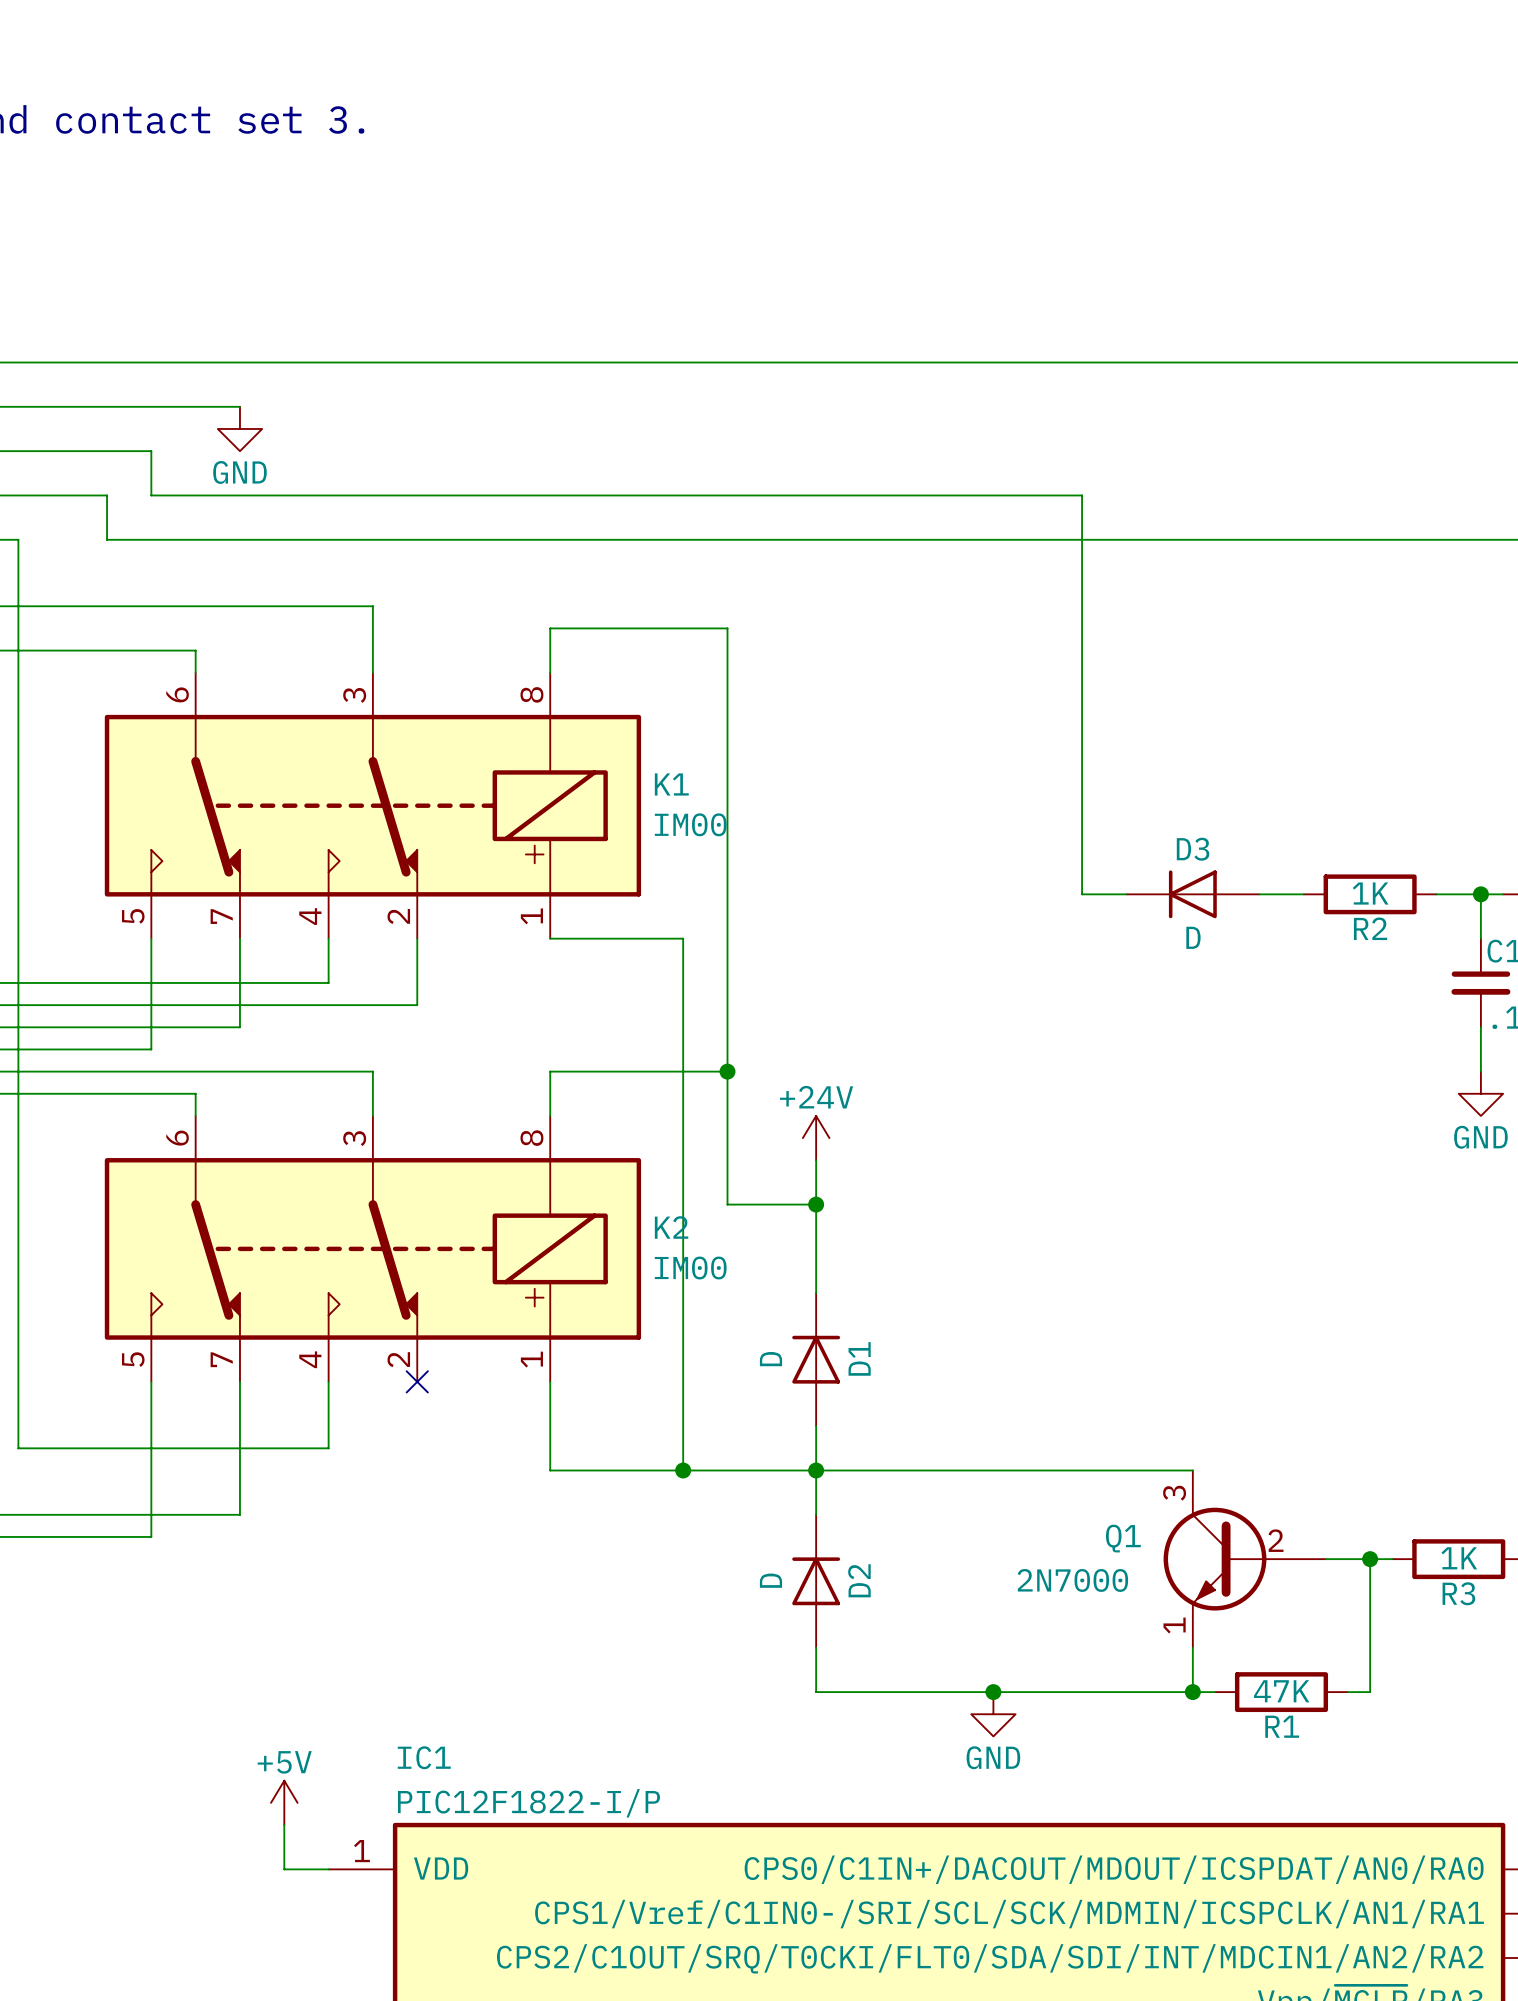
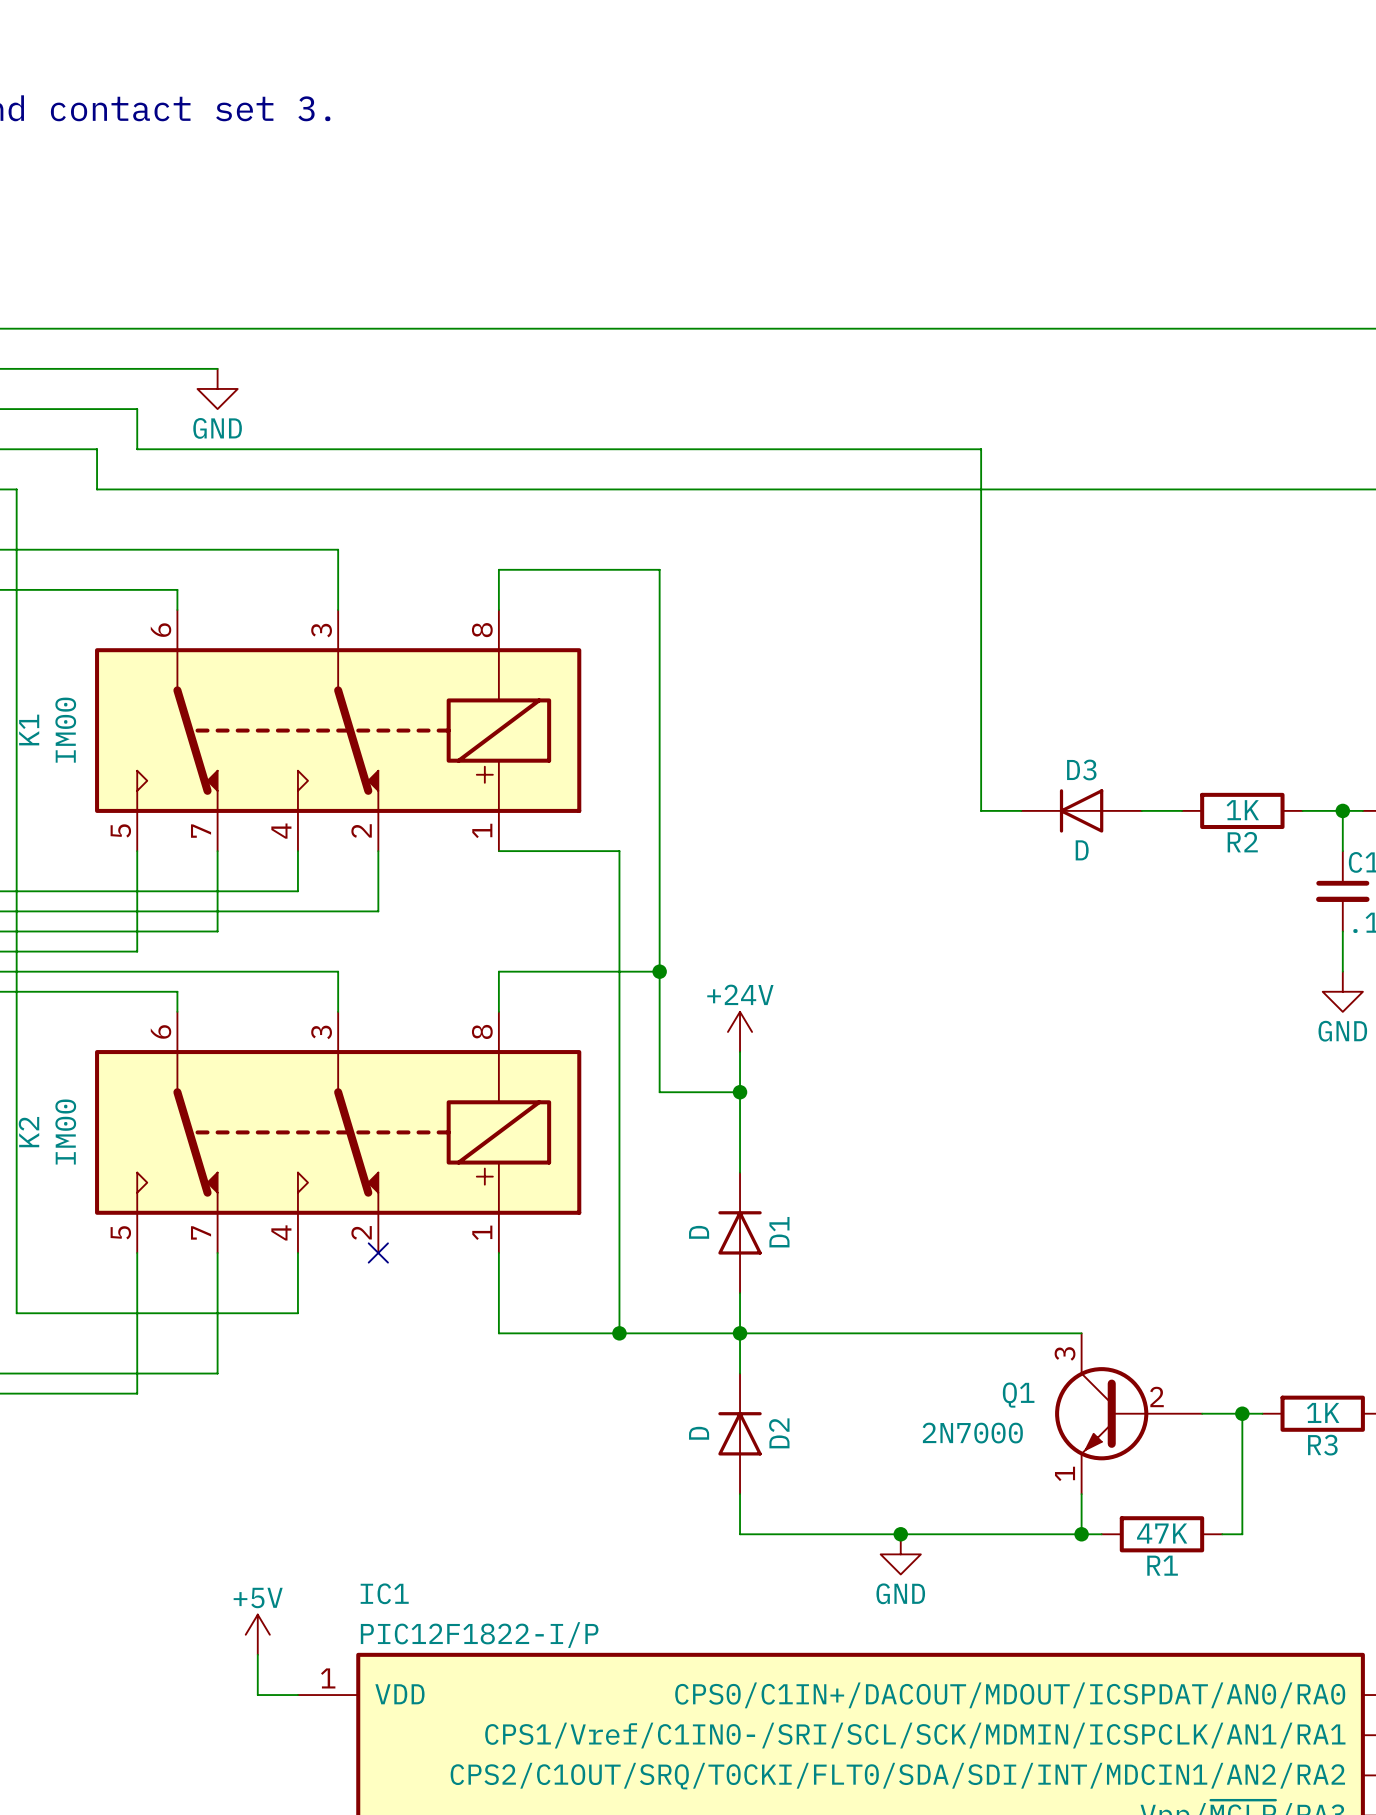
K1 name rotation: 0° (671, 784) -> 90° counterclockwise (29, 730)
K1 name position: K1 (671, 784) -> K1 (29, 730)
K1 value rotation: 0° (690, 824) -> 90° counterclockwise (65, 730)
K1 value position: IM00 (690, 824) -> IM00 (65, 730)
K2 name rotation: 0° (671, 1227) -> 90° counterclockwise (29, 1132)
K2 name position: K2 (671, 1227) -> K2 (29, 1132)
K2 value rotation: 0° (690, 1268) -> 90° counterclockwise (65, 1132)
K2 value position: IM00 (690, 1268) -> IM00 (65, 1132)

